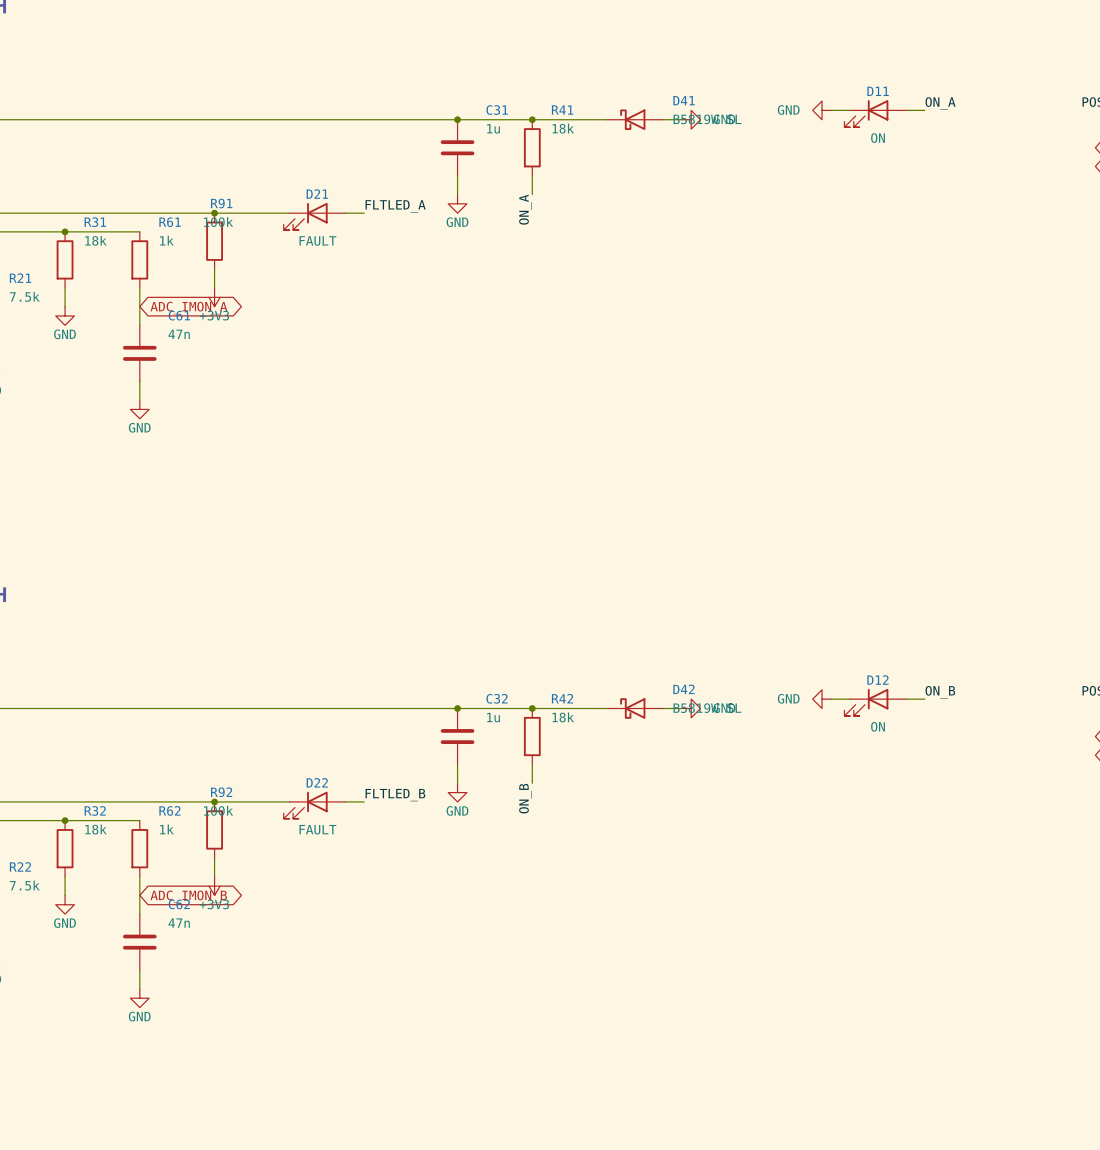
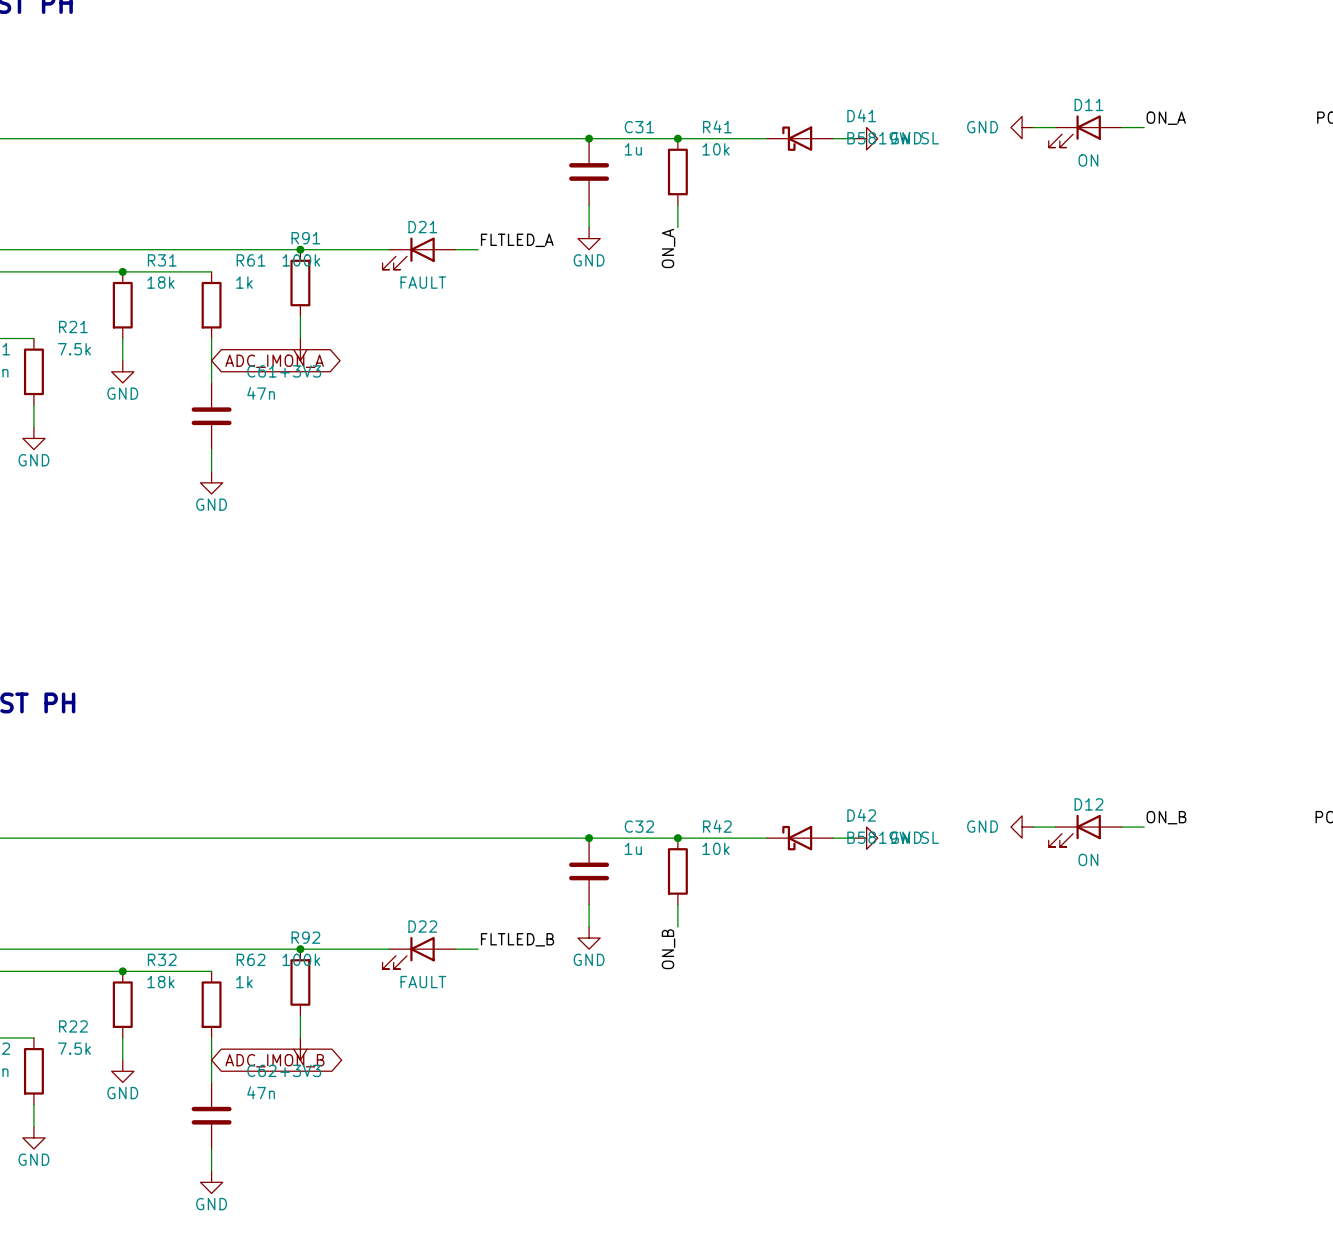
R41 value: 18k (563, 128) -> 10k (716, 149)
R42 value: 18k (563, 717) -> 10k (716, 848)

